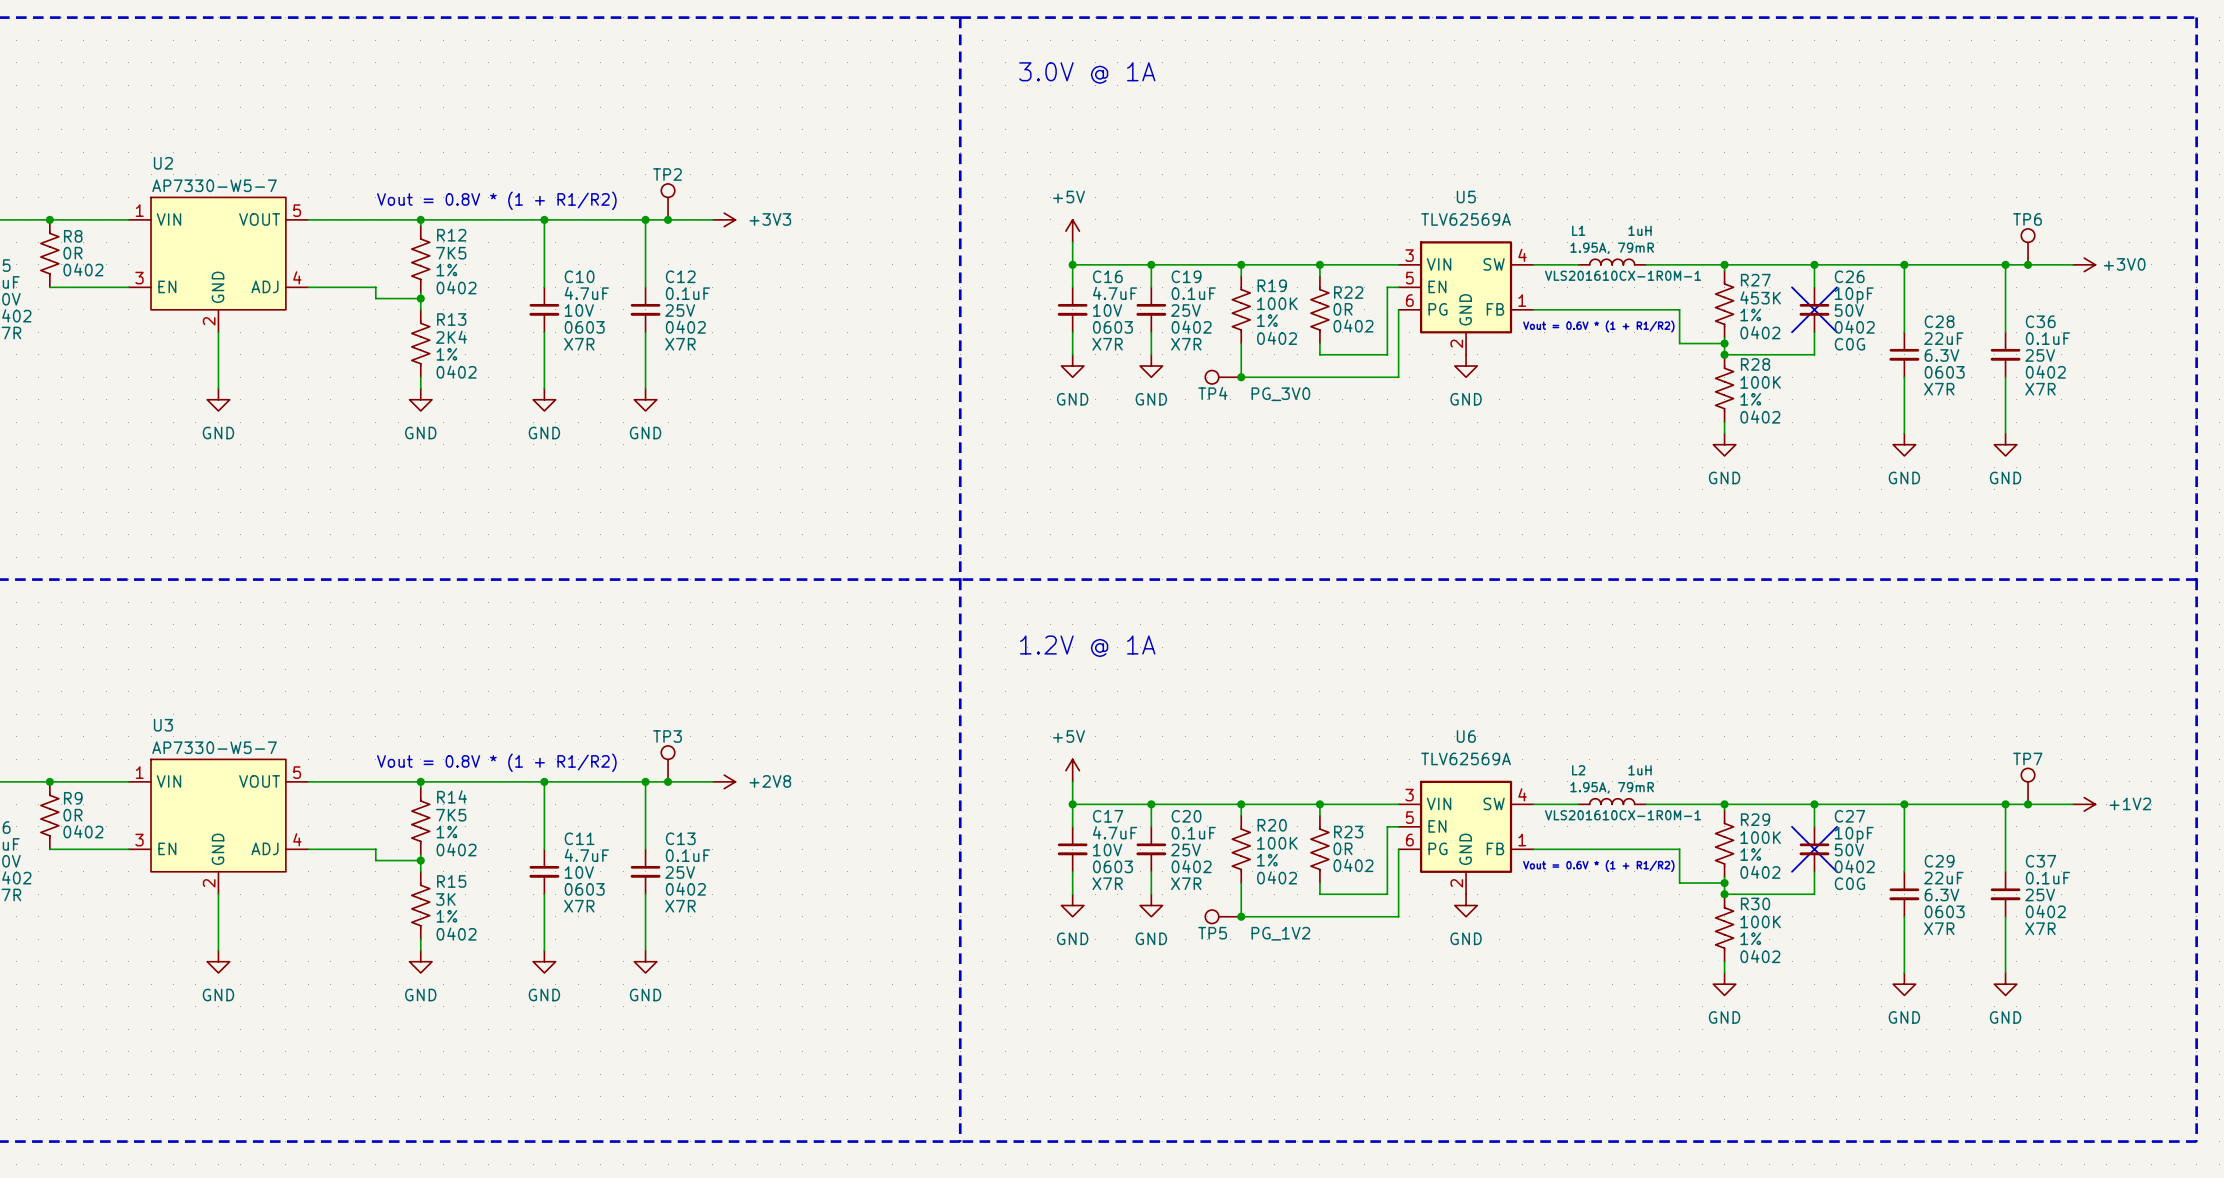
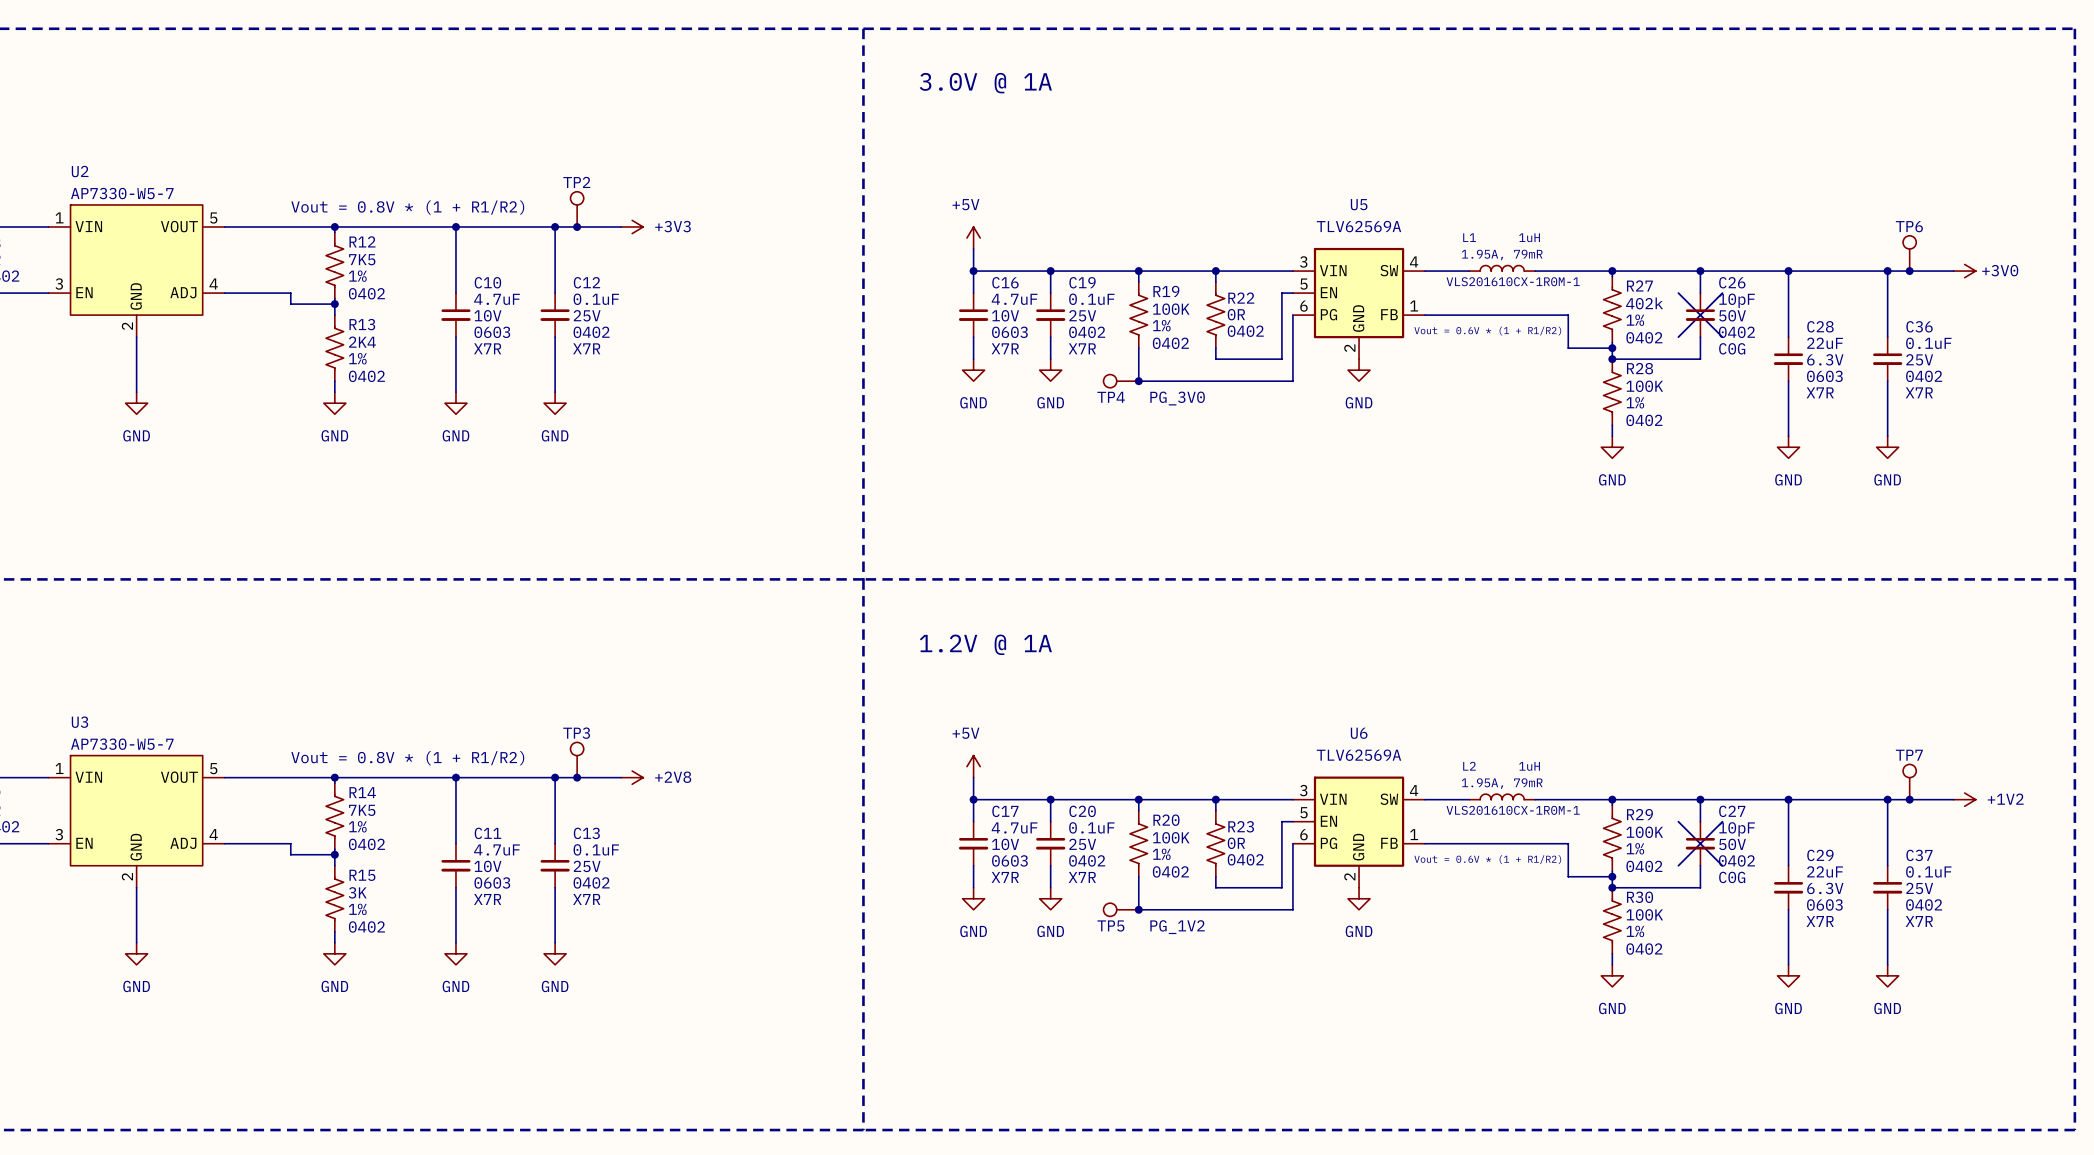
R27 value: 453K (1760, 297) -> 402k (1644, 303)

